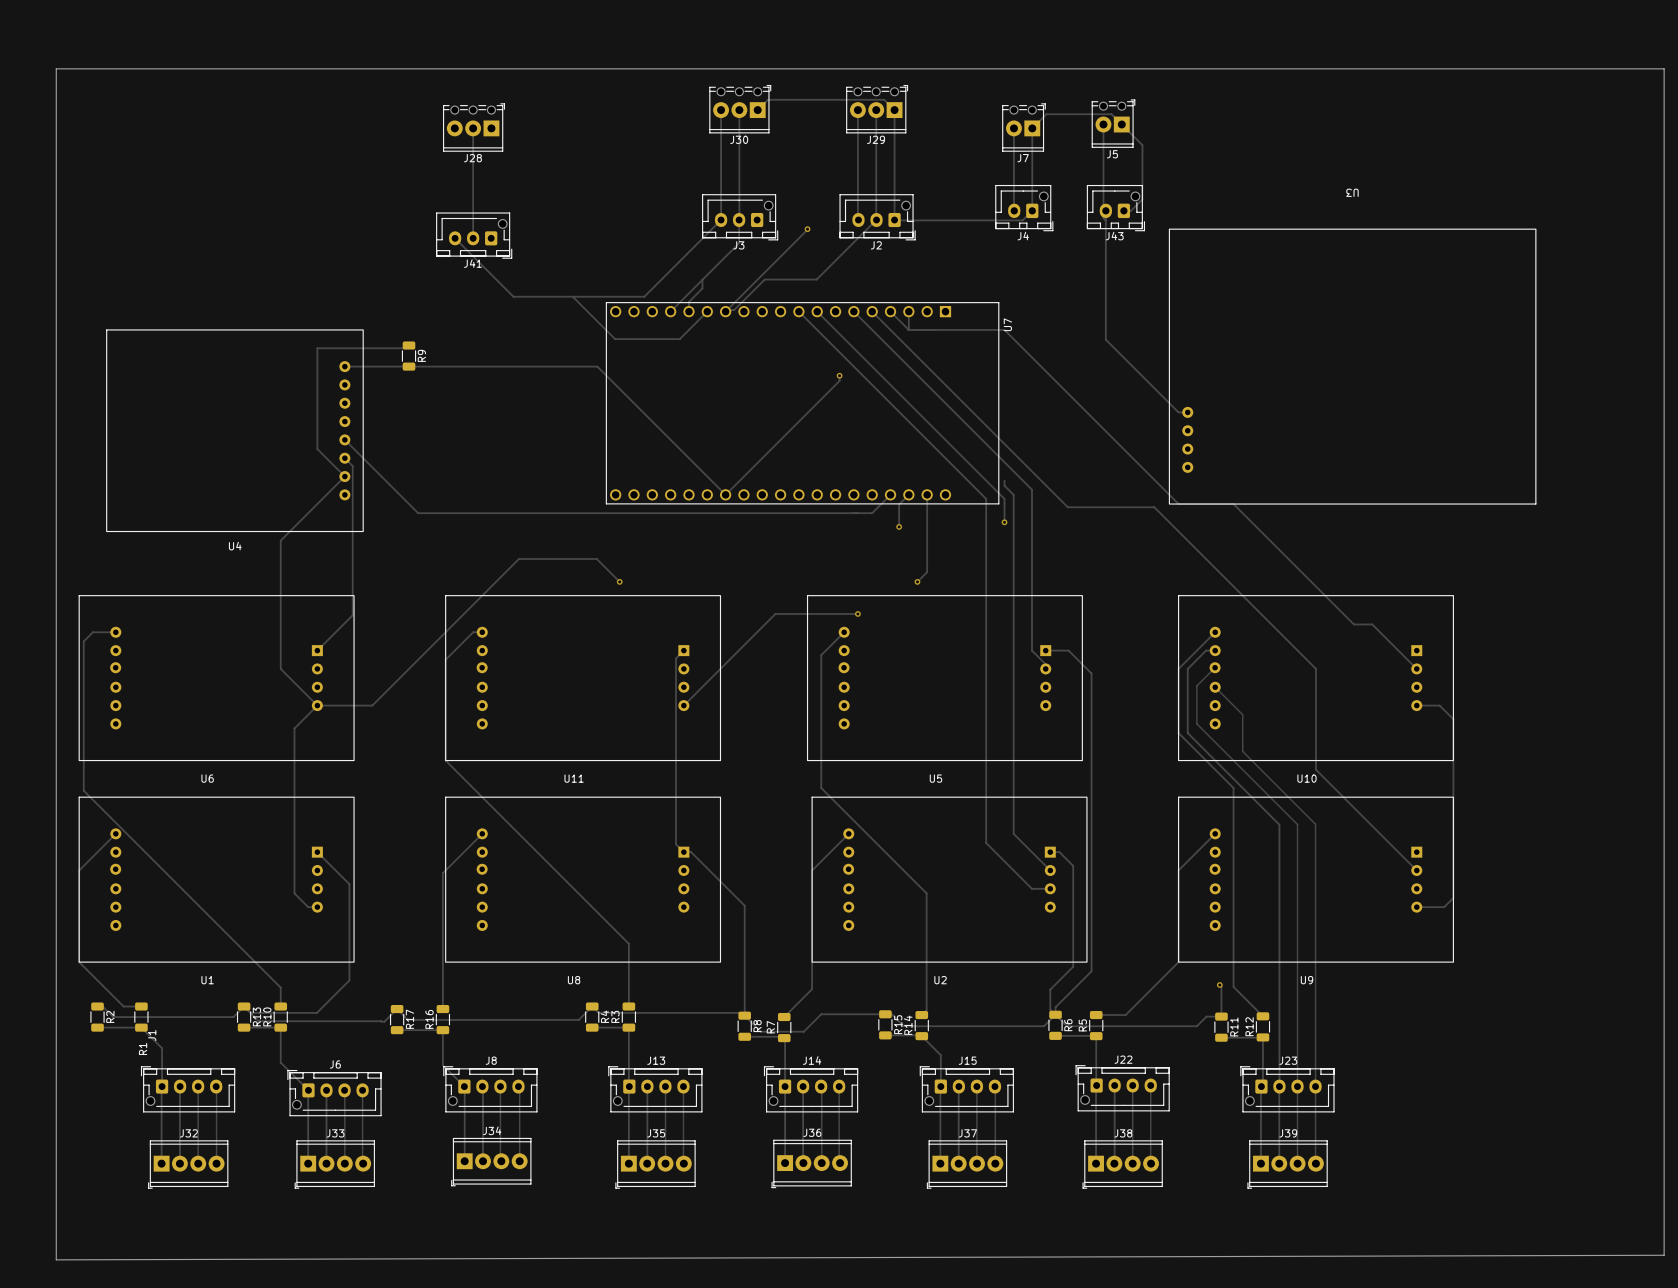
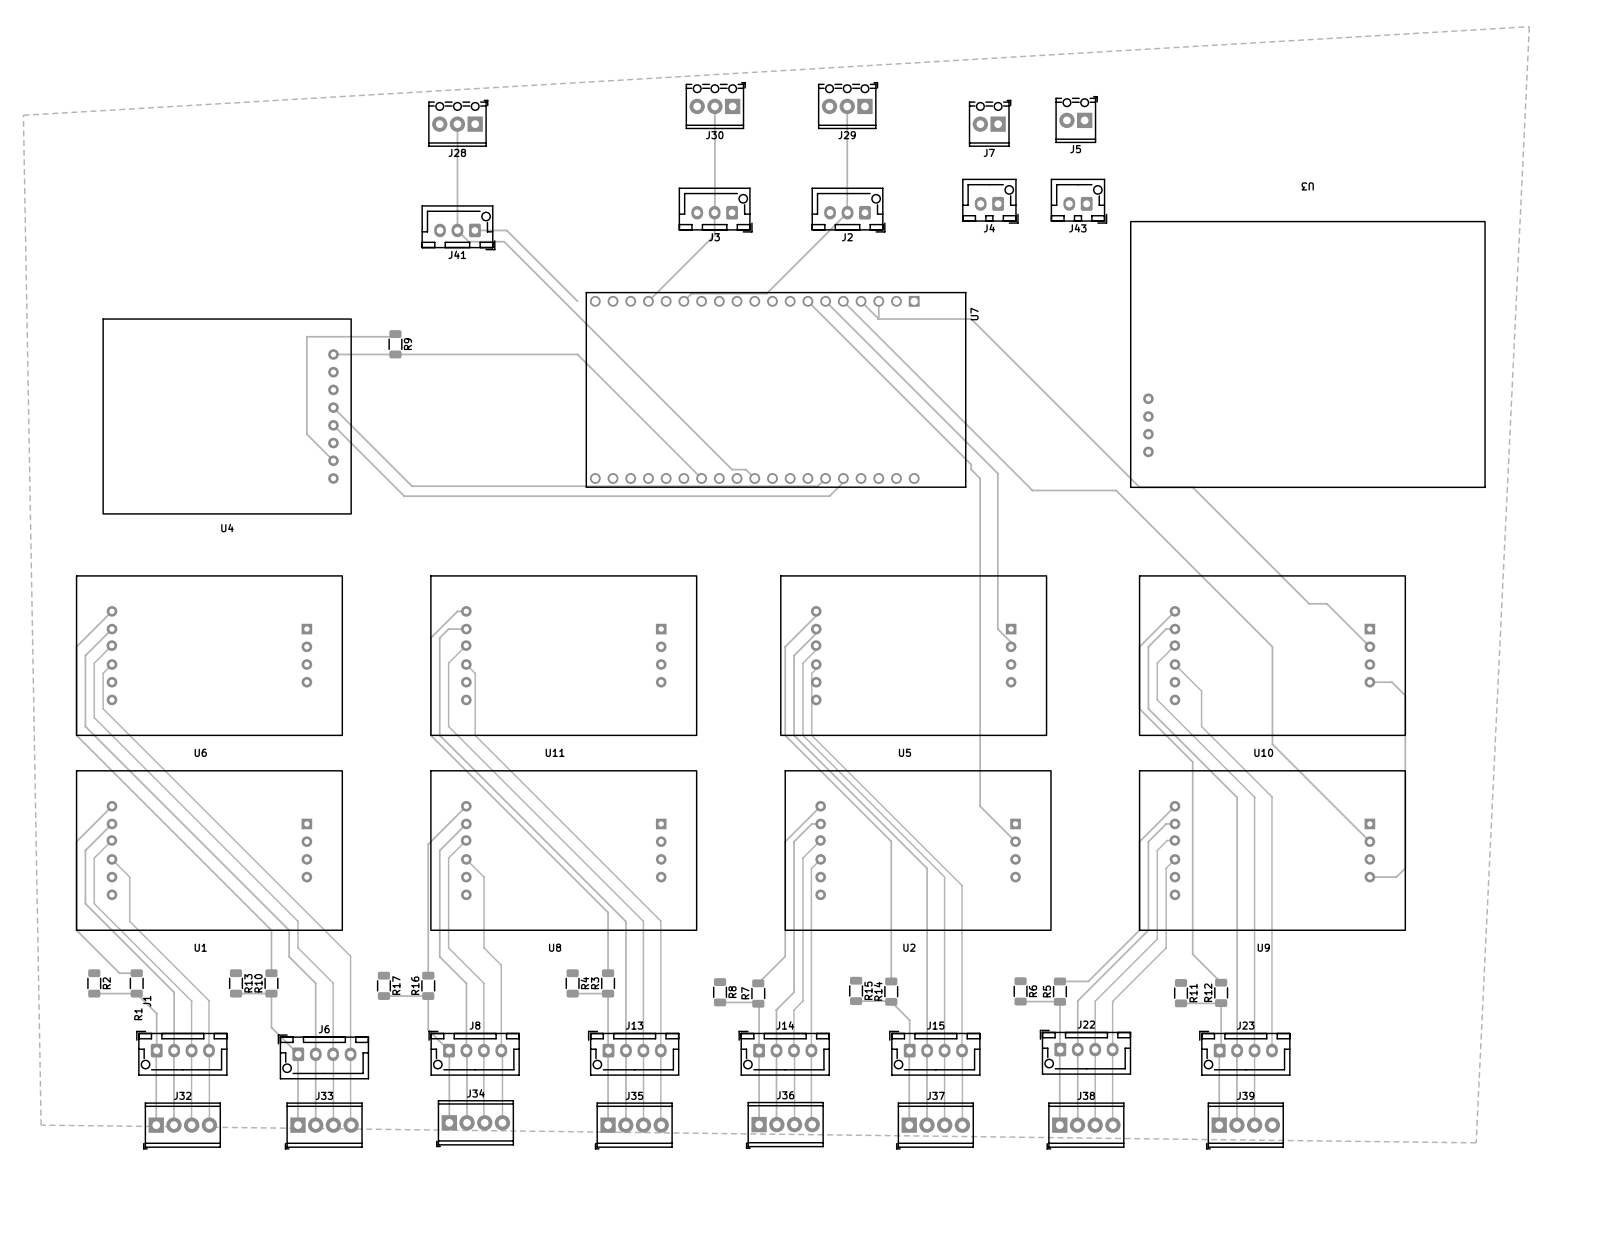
zone outline: none -> (1529, 26) (23, 115) (41, 1125) (1476, 1142) (1529, 26)
board edge: (56, 68) (56, 1259) (1664, 1255) (1664, 68) (56, 68) -> none
track: (721, 110) (721, 220) (644, 296) (513, 296) (455, 238) -> none
track: (757, 110) (767, 99) (884, 99) (894, 110) (894, 220) (1022, 220) (1032, 210) (1032, 128) (1046, 114) (1111, 114) (1142, 145) (1142, 199) (1130, 210) (1123, 210) -> none
track: (857, 110) (858, 220) -> none
track: (1103, 124) (1103, 218) (1105, 219) -> none
track: (1013, 128) (1014, 210) -> none
track: (1105, 210) (1105, 339) (1178, 412) (1187, 412) -> none
track: (876, 220) (816, 279) (764, 279) (727, 313) -> (847, 212) (766, 293) (691, 293) (683, 301)
track: (807, 229) (725, 311) -> none
via: (807, 229) -> none
track: none -> (457, 230) (468, 241) (504, 241) (732, 469) (745, 469) (754, 478)
track: none -> (474, 230) (506, 230) (577, 301)
track: (702, 279) (702, 288) (688, 301) (688, 311) -> none
track: (572, 296) (615, 339) (679, 339) (707, 311) -> none
track: (798, 311) (986, 498) (986, 843) (1031, 888) (1050, 888) -> none
track: (817, 311) (1004, 498) (1004, 522) -> none
track: none -> (807, 301) (971, 464)
track: (839, 375) (839, 380) (725, 494) -> none
via: (839, 375) -> none
track: none -> (333, 407) (412, 486) (817, 486) (825, 478)
track: (344, 458) (352, 466) (352, 615) (317, 650) -> none
track: (344, 476) (280, 540) (280, 668) (317, 705) -> none
track: (890, 494) (872, 513) (857, 513) -> (843, 482) (829, 496)
track: (908, 494) (899, 504) (899, 526) -> none
track: (927, 494) (927, 572) (917, 581) -> none
via: (1004, 522) -> none
via: (899, 526) -> none
track: (619, 581) (596, 558) (518, 558) (372, 705) (317, 705) -> none
via: (619, 581) -> none
via: (917, 581) -> none
track: (857, 613) (775, 613) (683, 705) -> none
via: (857, 613) -> none
track: (115, 632) (92, 632) (83, 641) (83, 790) (280, 987) -> (111, 611) (76, 646) (76, 735) (271, 930) (271, 954)
track: (844, 632) (821, 655) (821, 678) -> (820, 629) (794, 655)
track: none -> (820, 611) (785, 646) (785, 735) (891, 841) (891, 981)
track: none -> (111, 629) (85, 655) (85, 726) (289, 930) (289, 956) (315, 983) (315, 1054)
track: none -> (466, 629) (448, 629) (439, 637) (439, 735) (625, 921) (625, 1050)
track: (683, 650) (676, 658) (676, 844) (683, 852) (691, 852) (744, 905) (744, 1015) -> none
track: (1045, 650) (1068, 650) (1091, 673) (1091, 971) (1055, 1007) (1055, 1014) (1044, 1026) (903, 1026) (891, 1014) (821, 1014) (803, 1031) (760, 1031) (741, 1012) (598, 1012) (592, 1006) (578, 1019) (408, 1019) (397, 1009) (384, 1021) (258, 1021) (244, 1006) (233, 1017) (113, 1017) (102, 1006) -> none
track: none -> (111, 645) (94, 663) (94, 717) (298, 921) (298, 947) (333, 983) (333, 1054)
track: none -> (466, 645) (448, 663) (448, 726) (643, 921) (643, 1050)
track: none -> (820, 645) (802, 663) (802, 735) (944, 877) (944, 1050)
track: none -> (111, 664) (103, 673) (103, 708) (350, 956) (350, 1054)
track: none -> (466, 664) (475, 673) (475, 735) (660, 921) (660, 1050)
track: none -> (820, 664) (811, 673) (811, 735) (962, 885) (962, 1050)
track: (317, 705) (294, 728) (294, 893) (308, 907) (317, 907) -> none
track: (821, 760) (821, 788) (926, 893) (926, 1010) (921, 1015) -> (794, 735) (927, 868) (927, 1050)
track: none -> (111, 823) (85, 850) (85, 903) (174, 992) (174, 1050)
track: (317, 852) (349, 884) (349, 980) (316, 1012) (250, 1012) -> none
track: none -> (466, 823) (439, 850) (439, 956) (466, 983) (466, 1050)
track: none -> (820, 823) (811, 823) (794, 841) (794, 992) (776, 1009) (776, 1050)
track: (1050, 852) (1059, 852) (1073, 865) (1073, 966) (1050, 989) (1050, 1009) (1066, 1026) (1196, 1026) (1206, 1016) (1221, 1016) (1221, 986) (1219, 985) -> none
track: none -> (1175, 823) (1166, 823) (1148, 841) (1148, 930) (1077, 1000) (1077, 1049)
track: none -> (111, 840) (94, 858) (94, 903) (191, 1001) (191, 1050)
track: none -> (466, 840) (448, 858) (448, 947) (483, 983) (483, 1050)
track: none -> (820, 840) (802, 858) (802, 1001) (793, 1010) (793, 1050)
track: none -> (1174, 840) (1167, 840) (1157, 850) (1157, 939) (1095, 1001) (1095, 1049)
track: none -> (111, 859) (129, 877) (129, 921) (209, 1000) (209, 1050)
track: none -> (466, 859) (484, 877) (484, 947) (501, 965) (501, 1050)
track: none -> (820, 859) (811, 868) (811, 1050)
track: none -> (1175, 859) (1166, 868) (1166, 947) (1112, 1001) (1112, 1049)
via: (1219, 985) -> none
track: (1315, 1086) (1315, 1163) -> none

